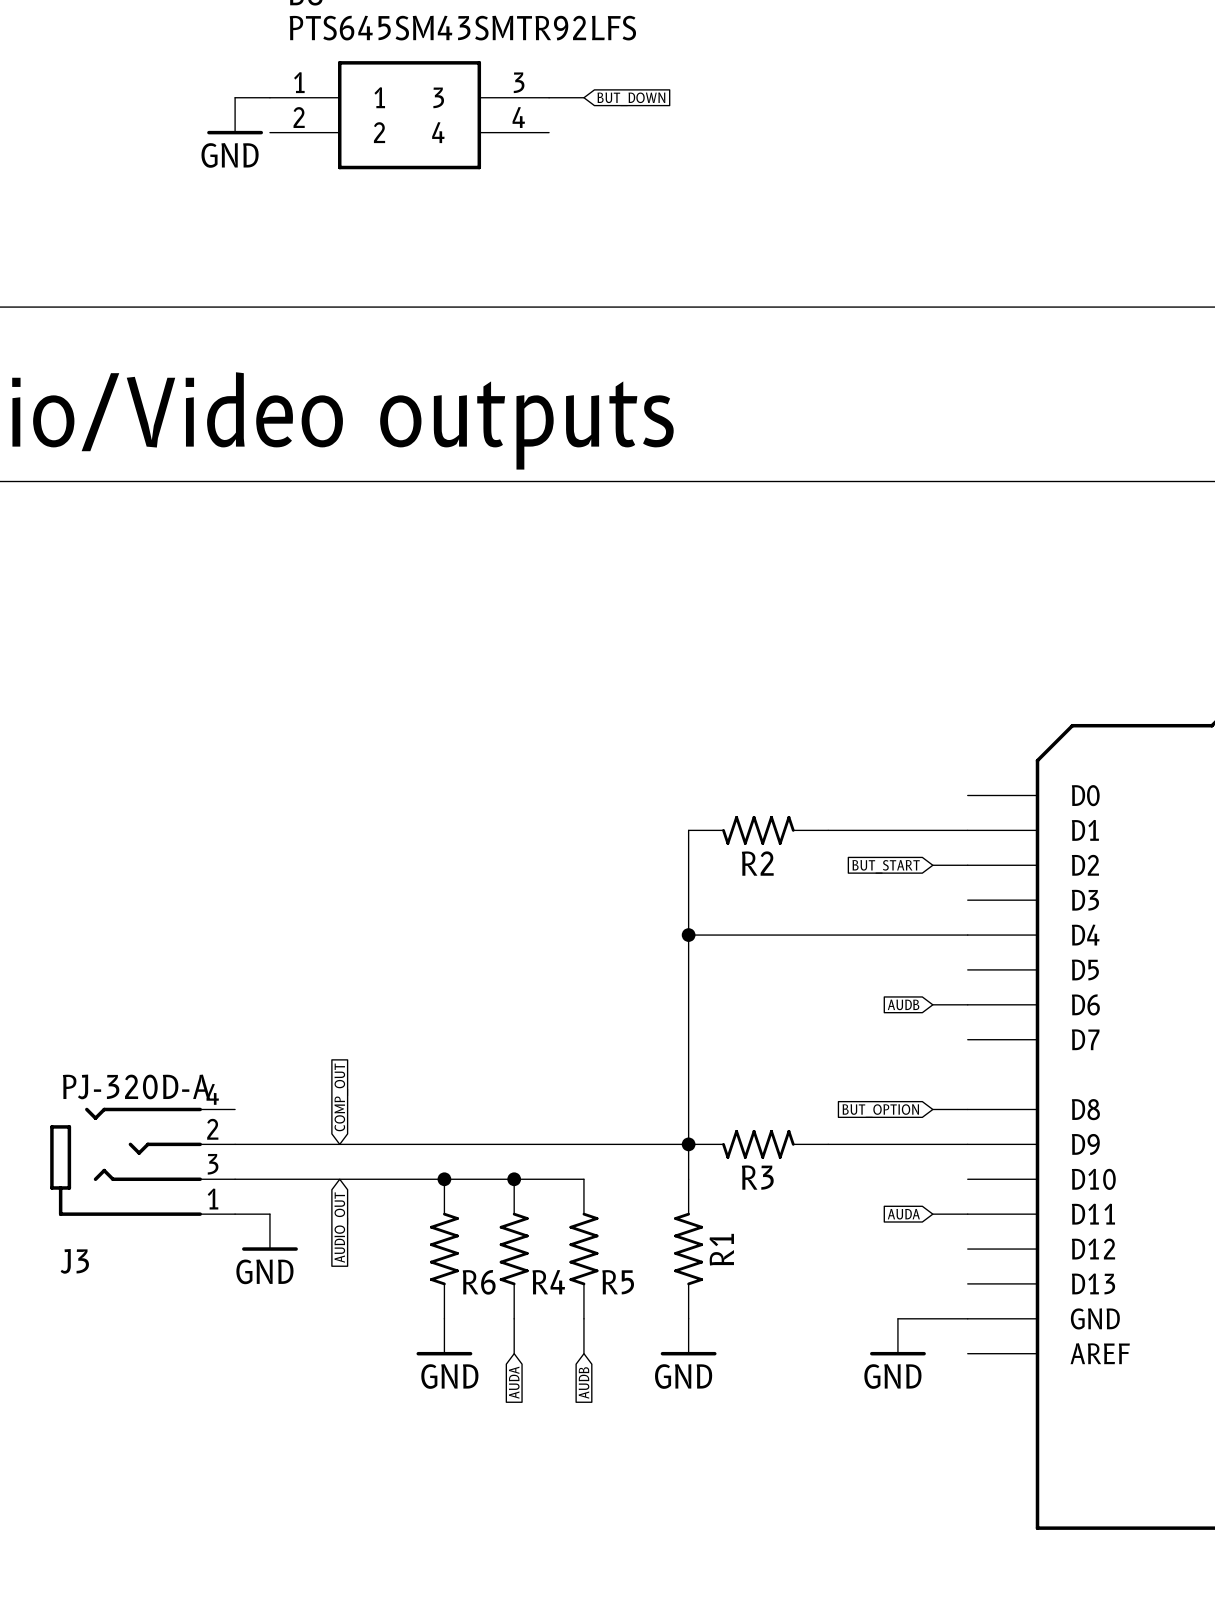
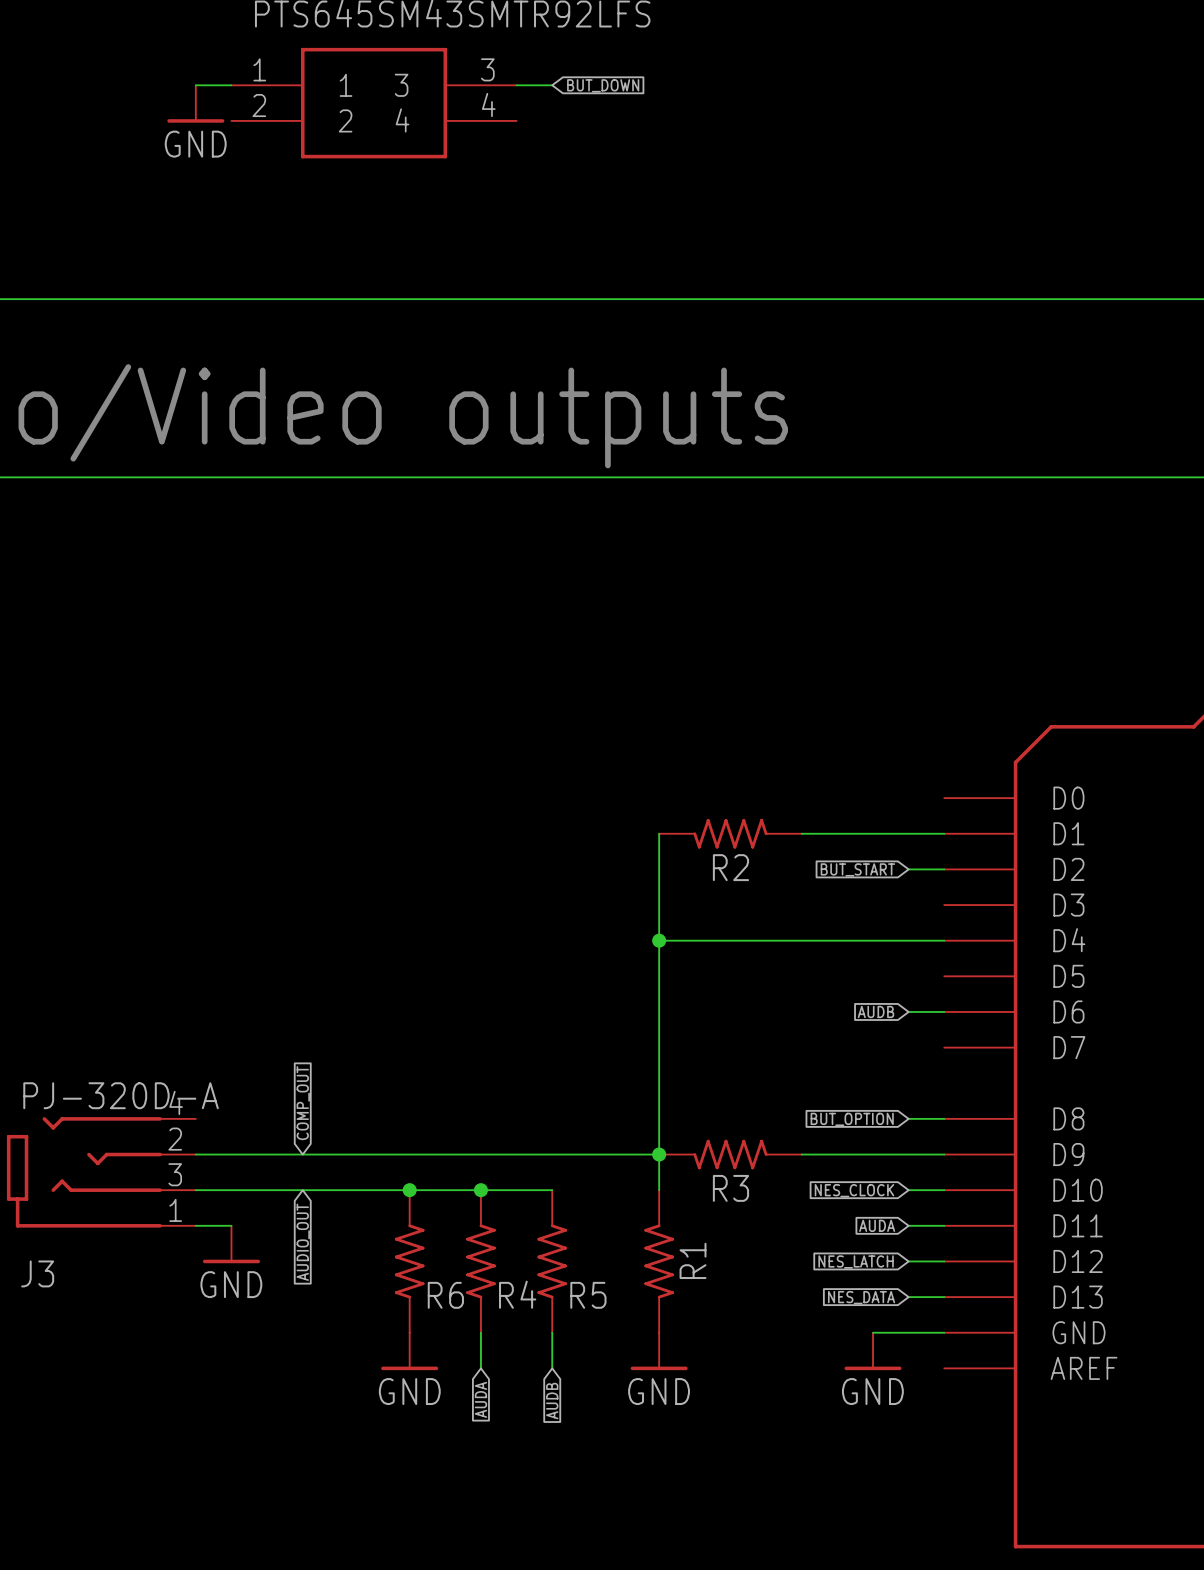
wire: none -> (908, 1190) (944, 1190)
global label: none -> NES_CLOCK (854, 1190)
wire: none -> (908, 1261) (944, 1261)
global label: none -> NES_LATCH (856, 1261)
wire: none -> (908, 1297) (944, 1297)
global label: none -> NES_DATA (861, 1297)

